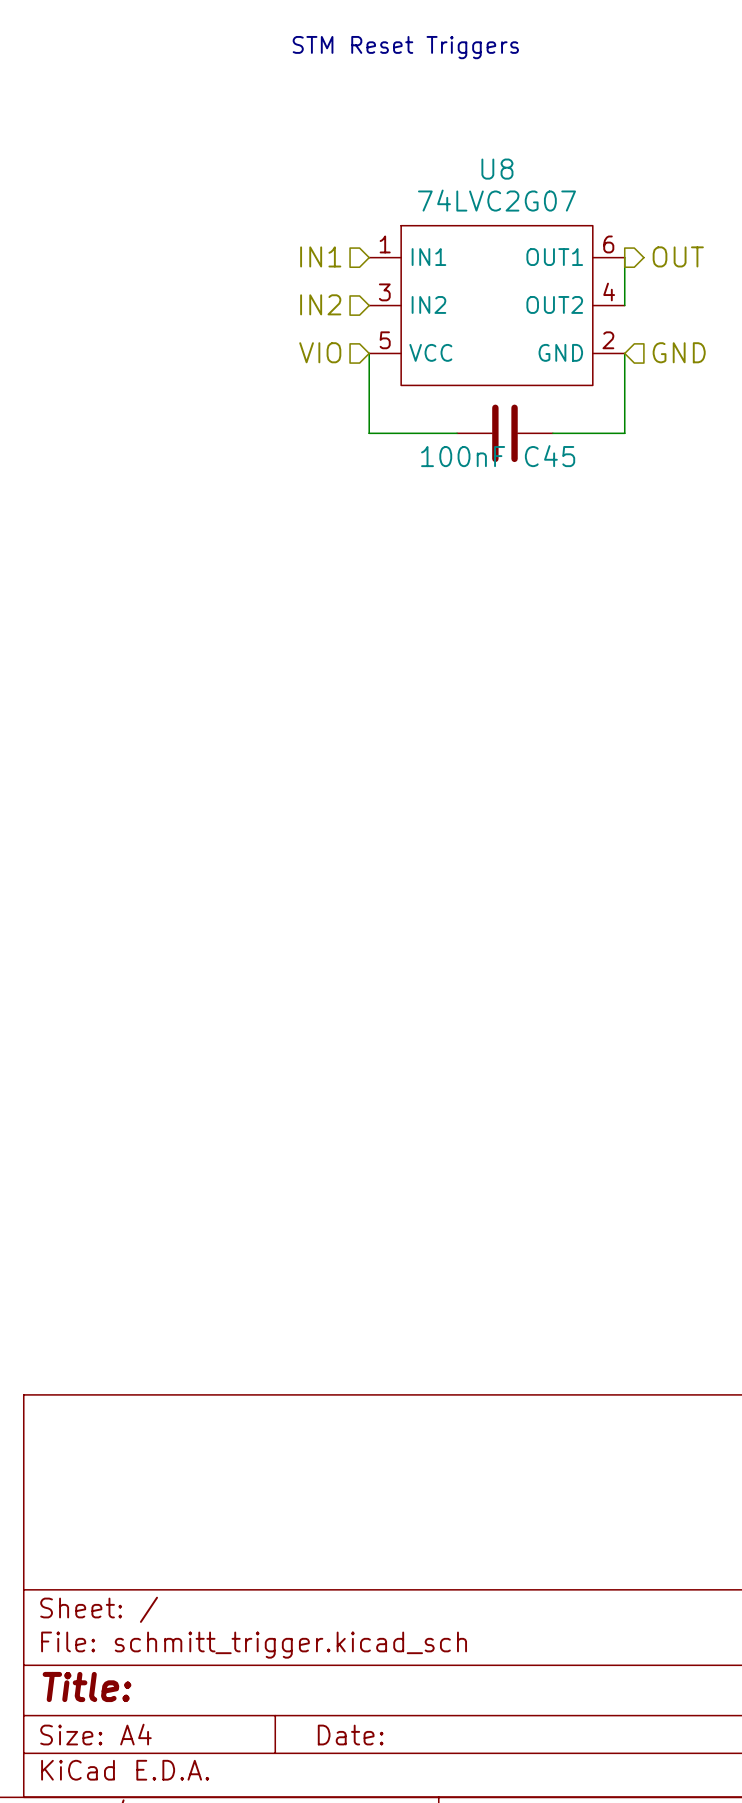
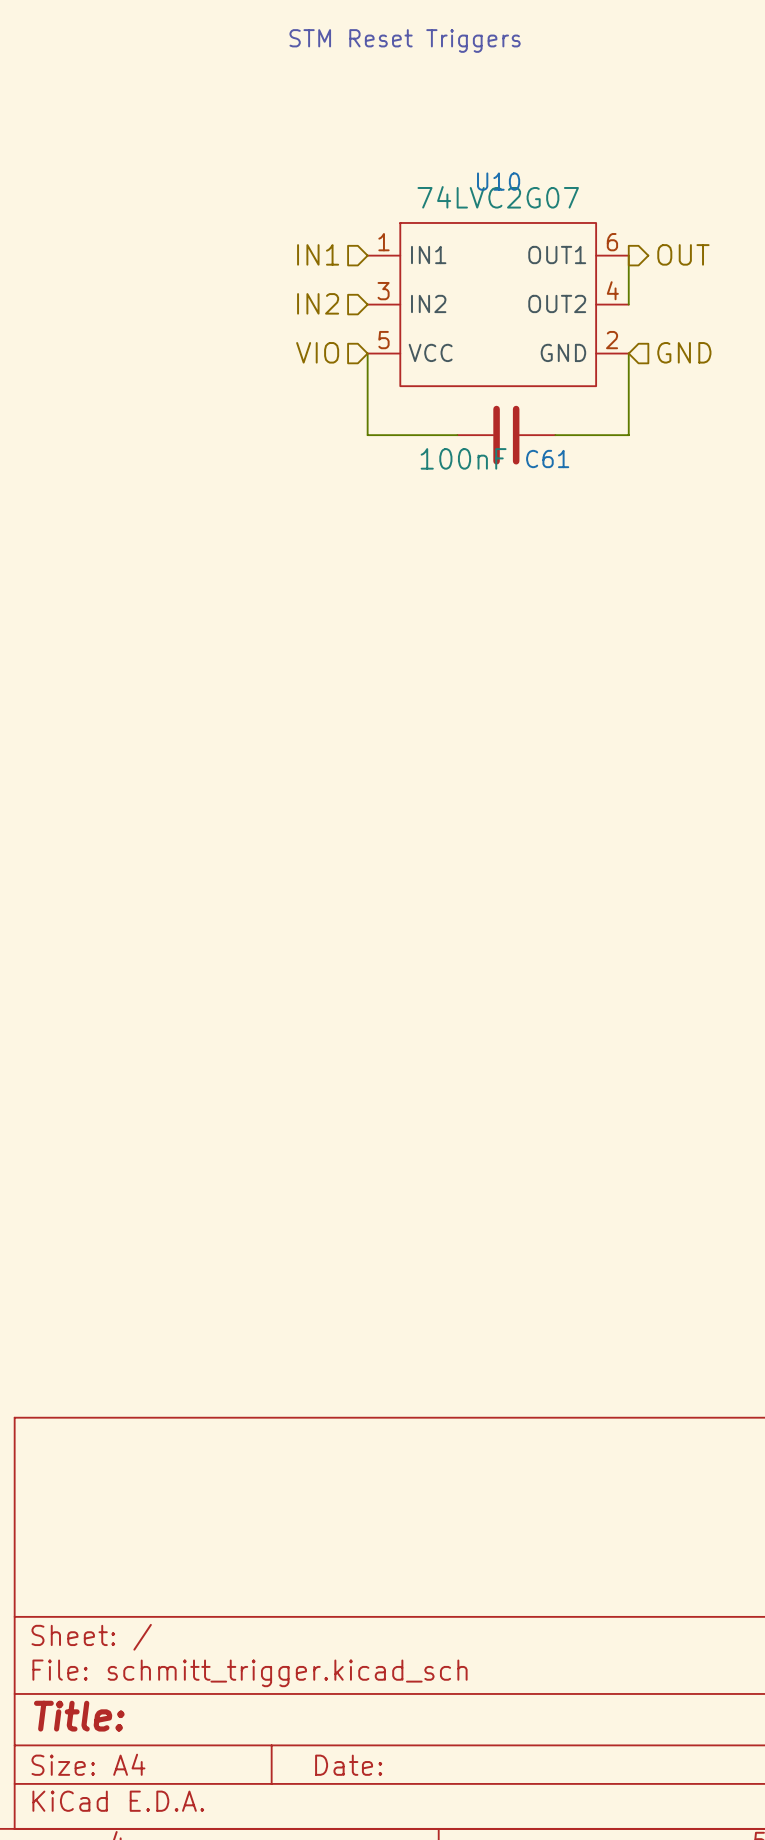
U8 name: U8 (497, 169) -> U10 (498, 181)
C45 name: C45 (550, 456) -> C61 (547, 459)

